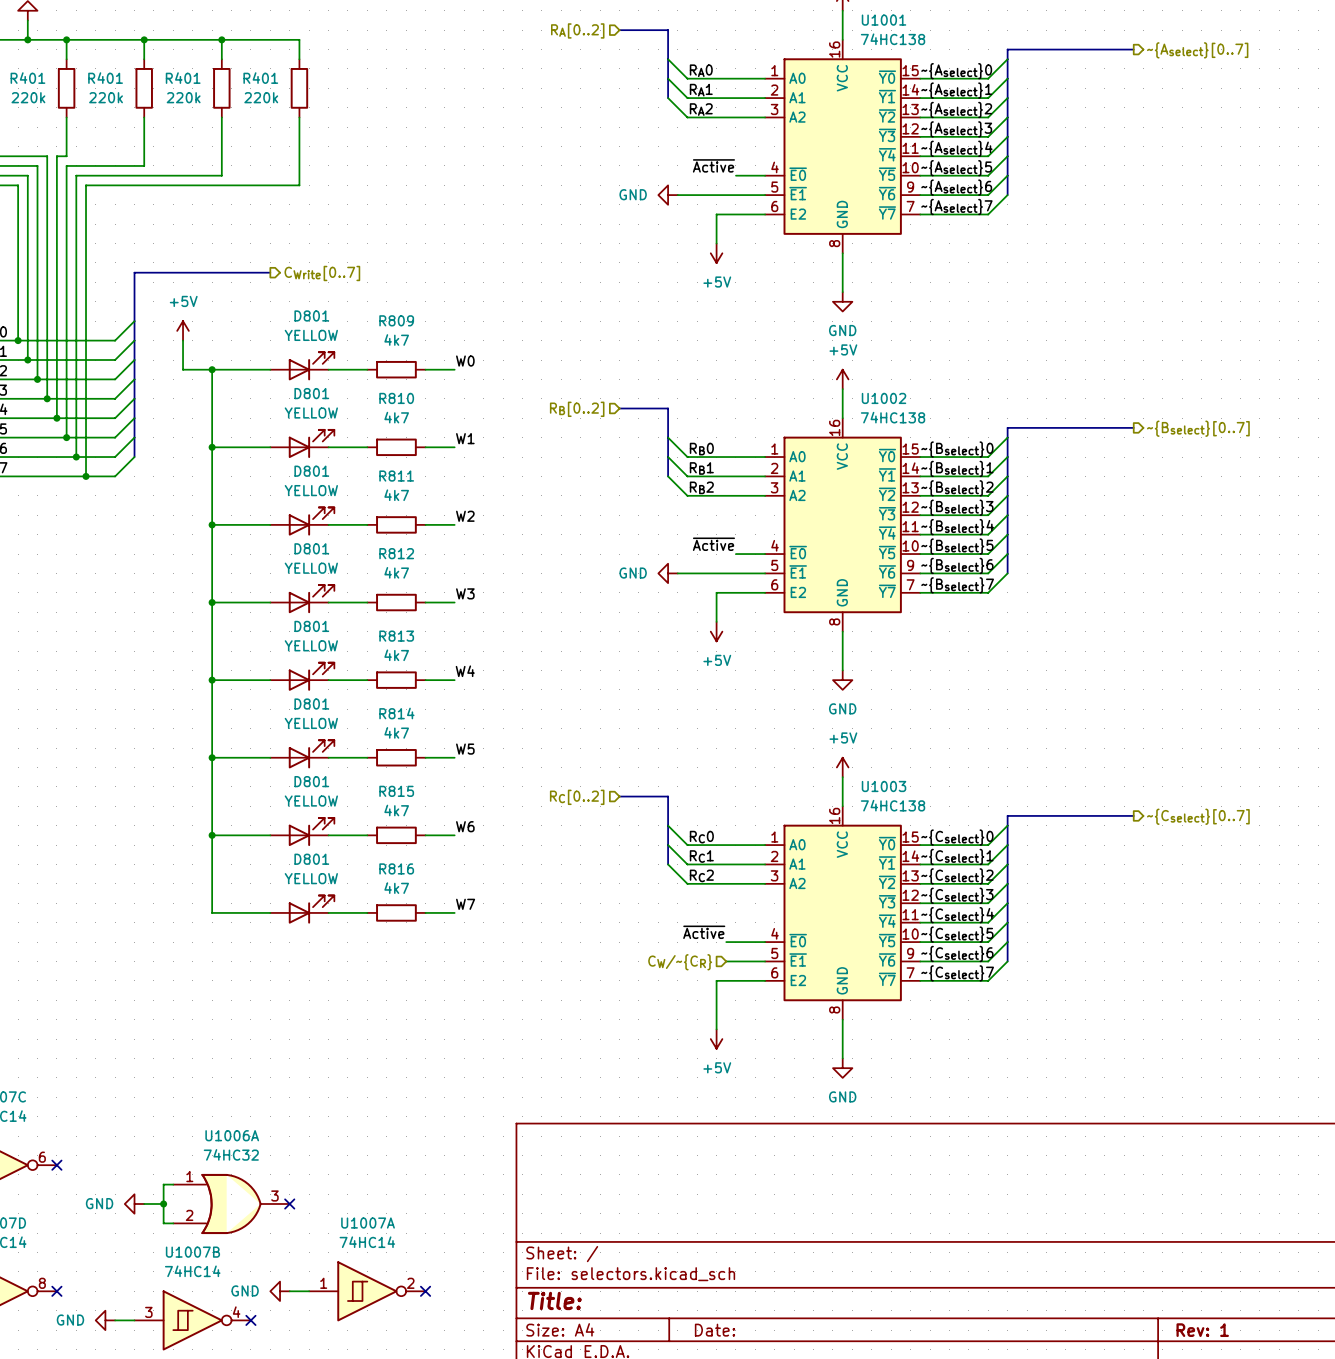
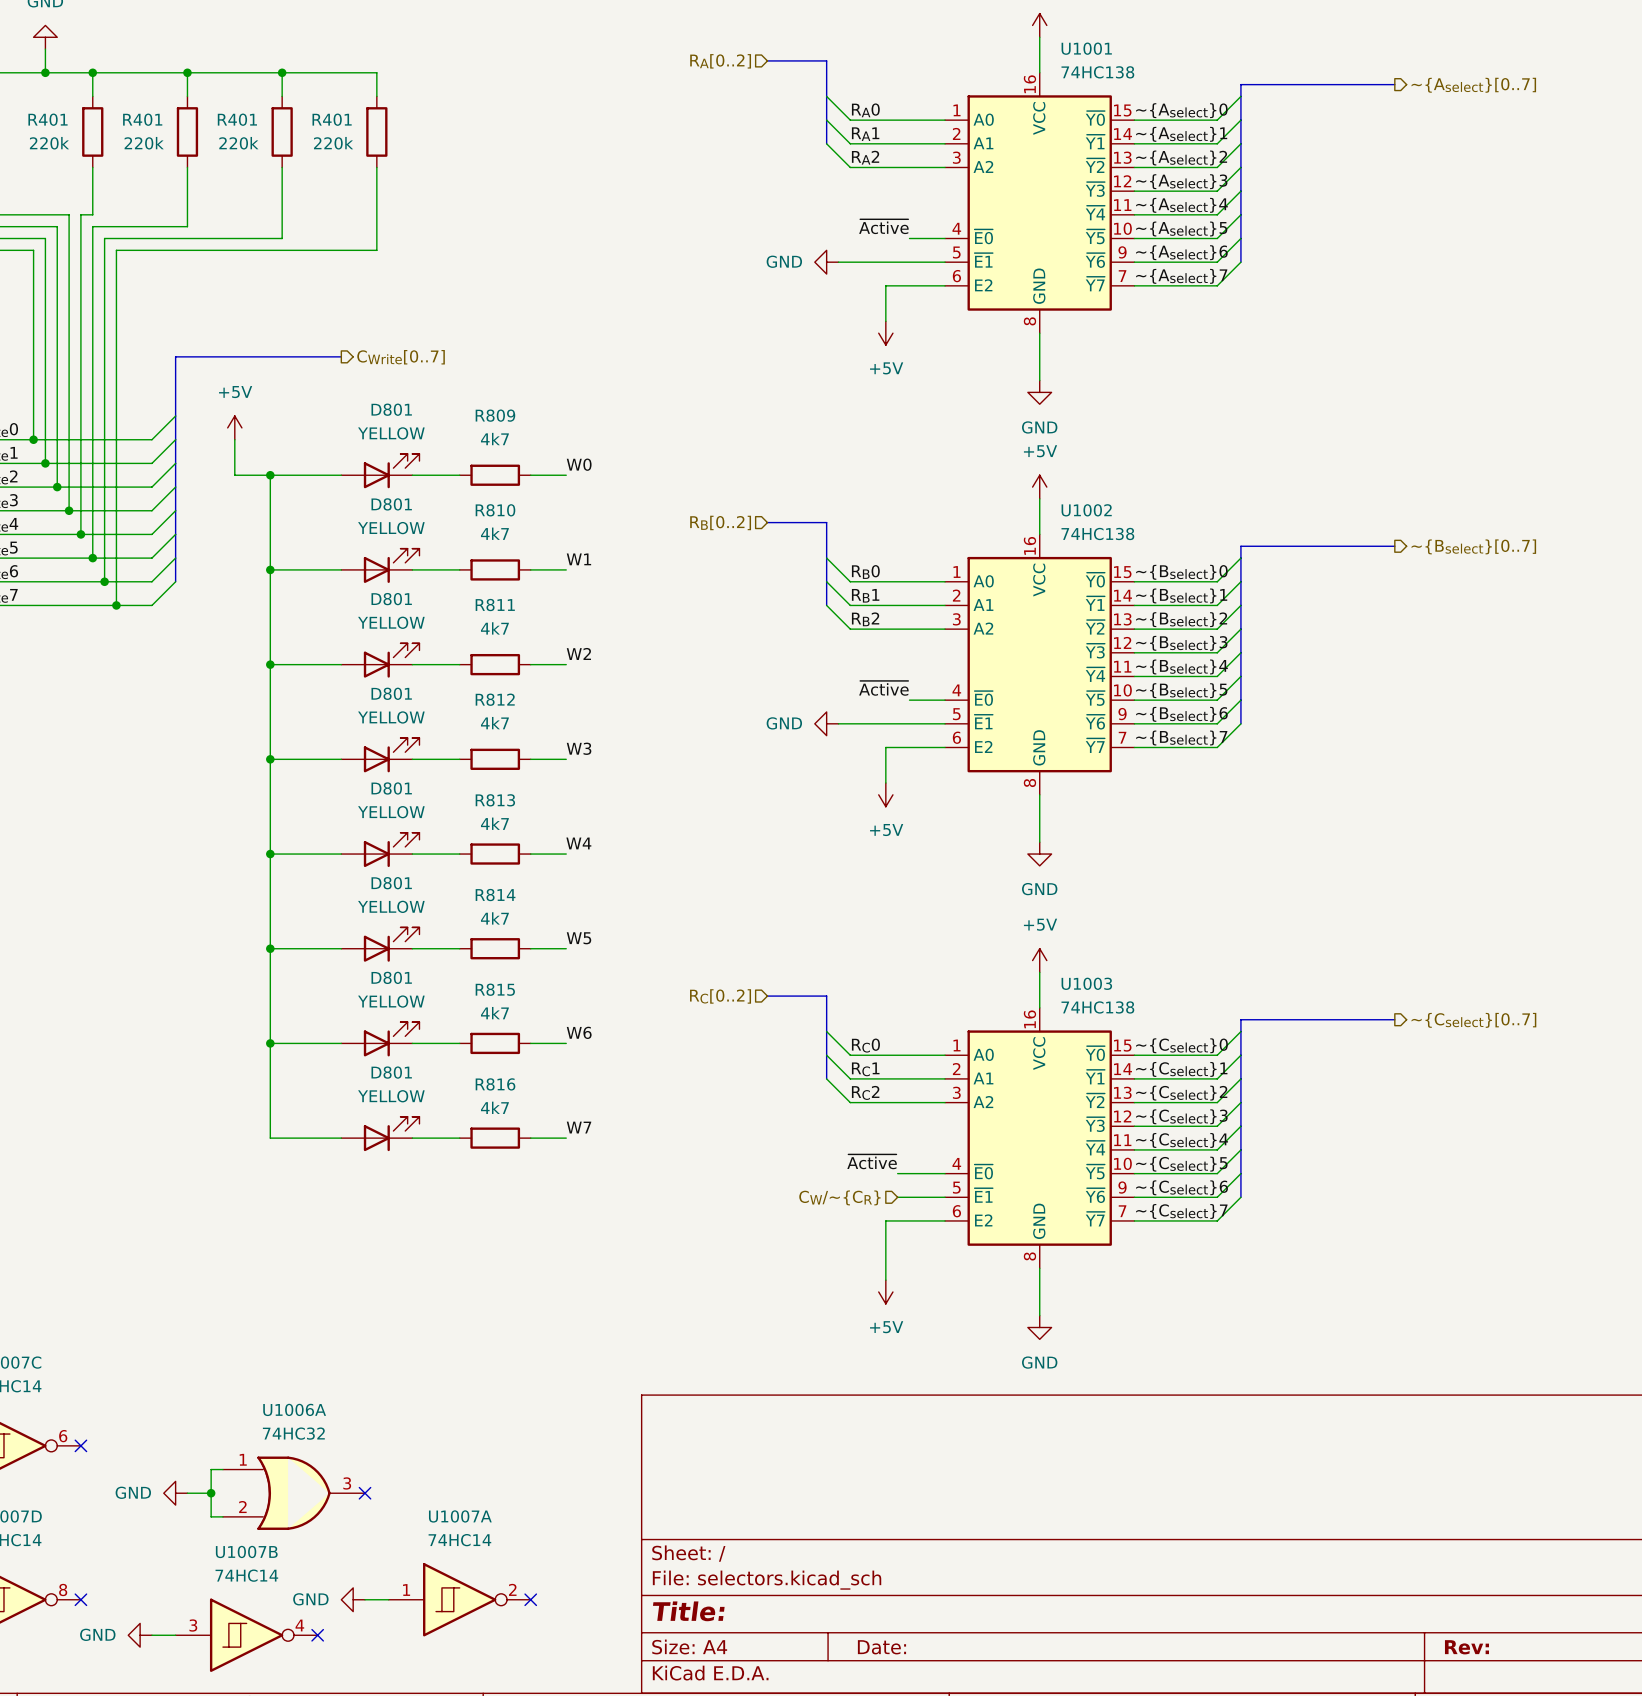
title block: Rev: 1 (1202, 1330) -> Rev: (1466, 1647)

